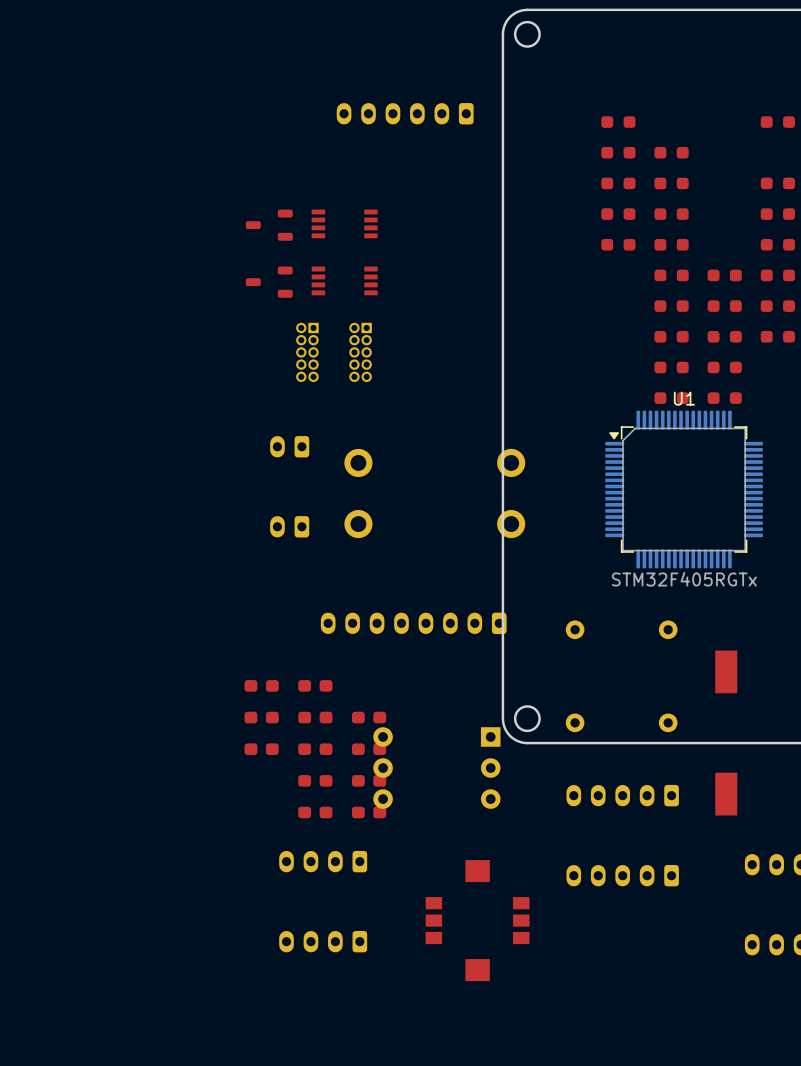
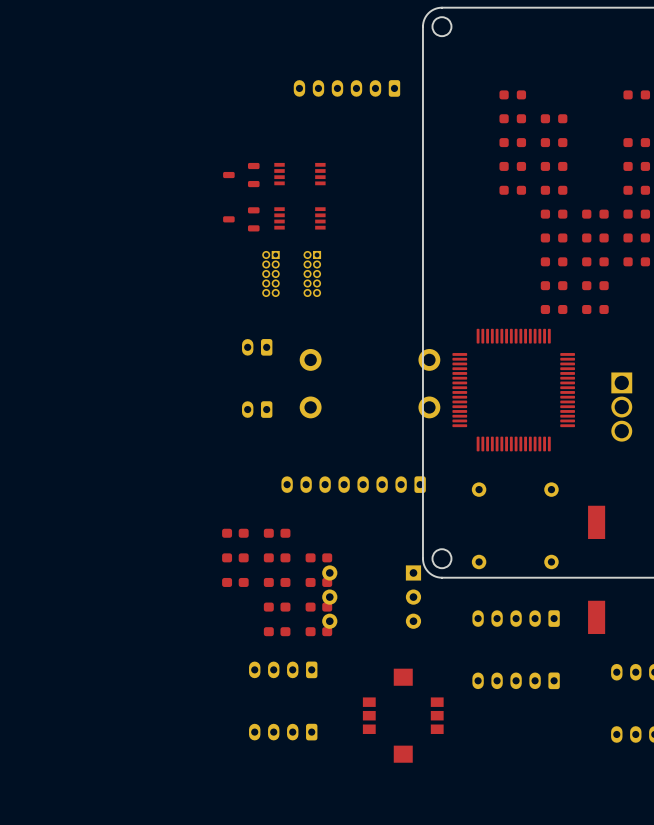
U1 side: bottom (684, 489) -> top (513, 390)
part: none -> (621, 407)

